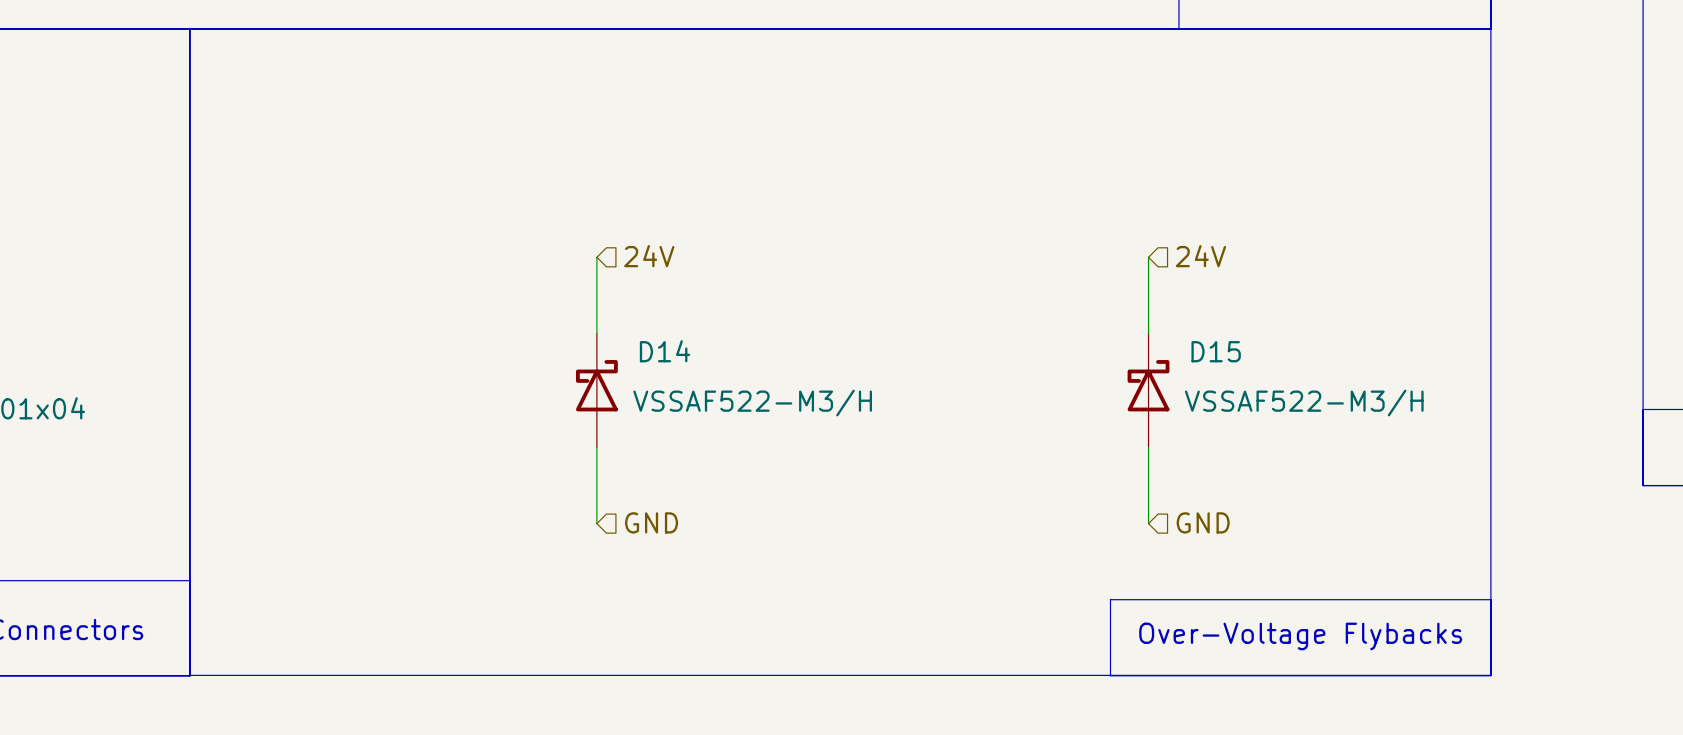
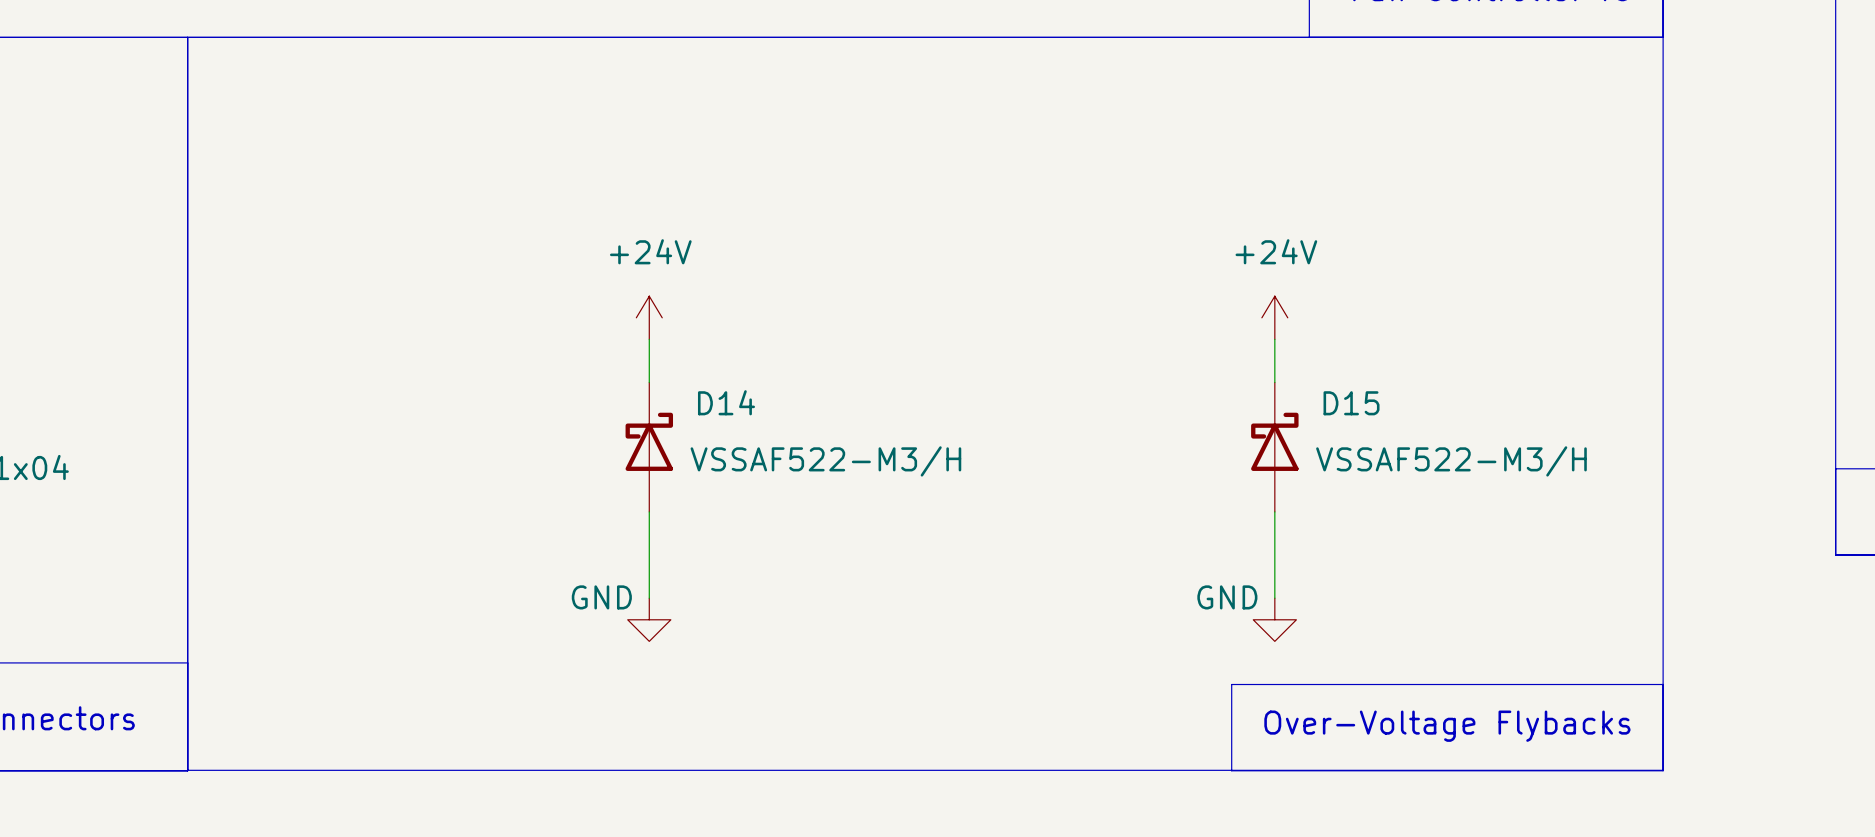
hierarchical label: 24V (649, 256) -> none
hierarchical label: 24V (1200, 256) -> none
power symbol: none -> +24V (649, 317)
power symbol: none -> +24V (1274, 317)
hierarchical label: GND (651, 522) -> none
hierarchical label: GND (1203, 522) -> none
power symbol: none -> GND (649, 619)
power symbol: none -> GND (1274, 619)

